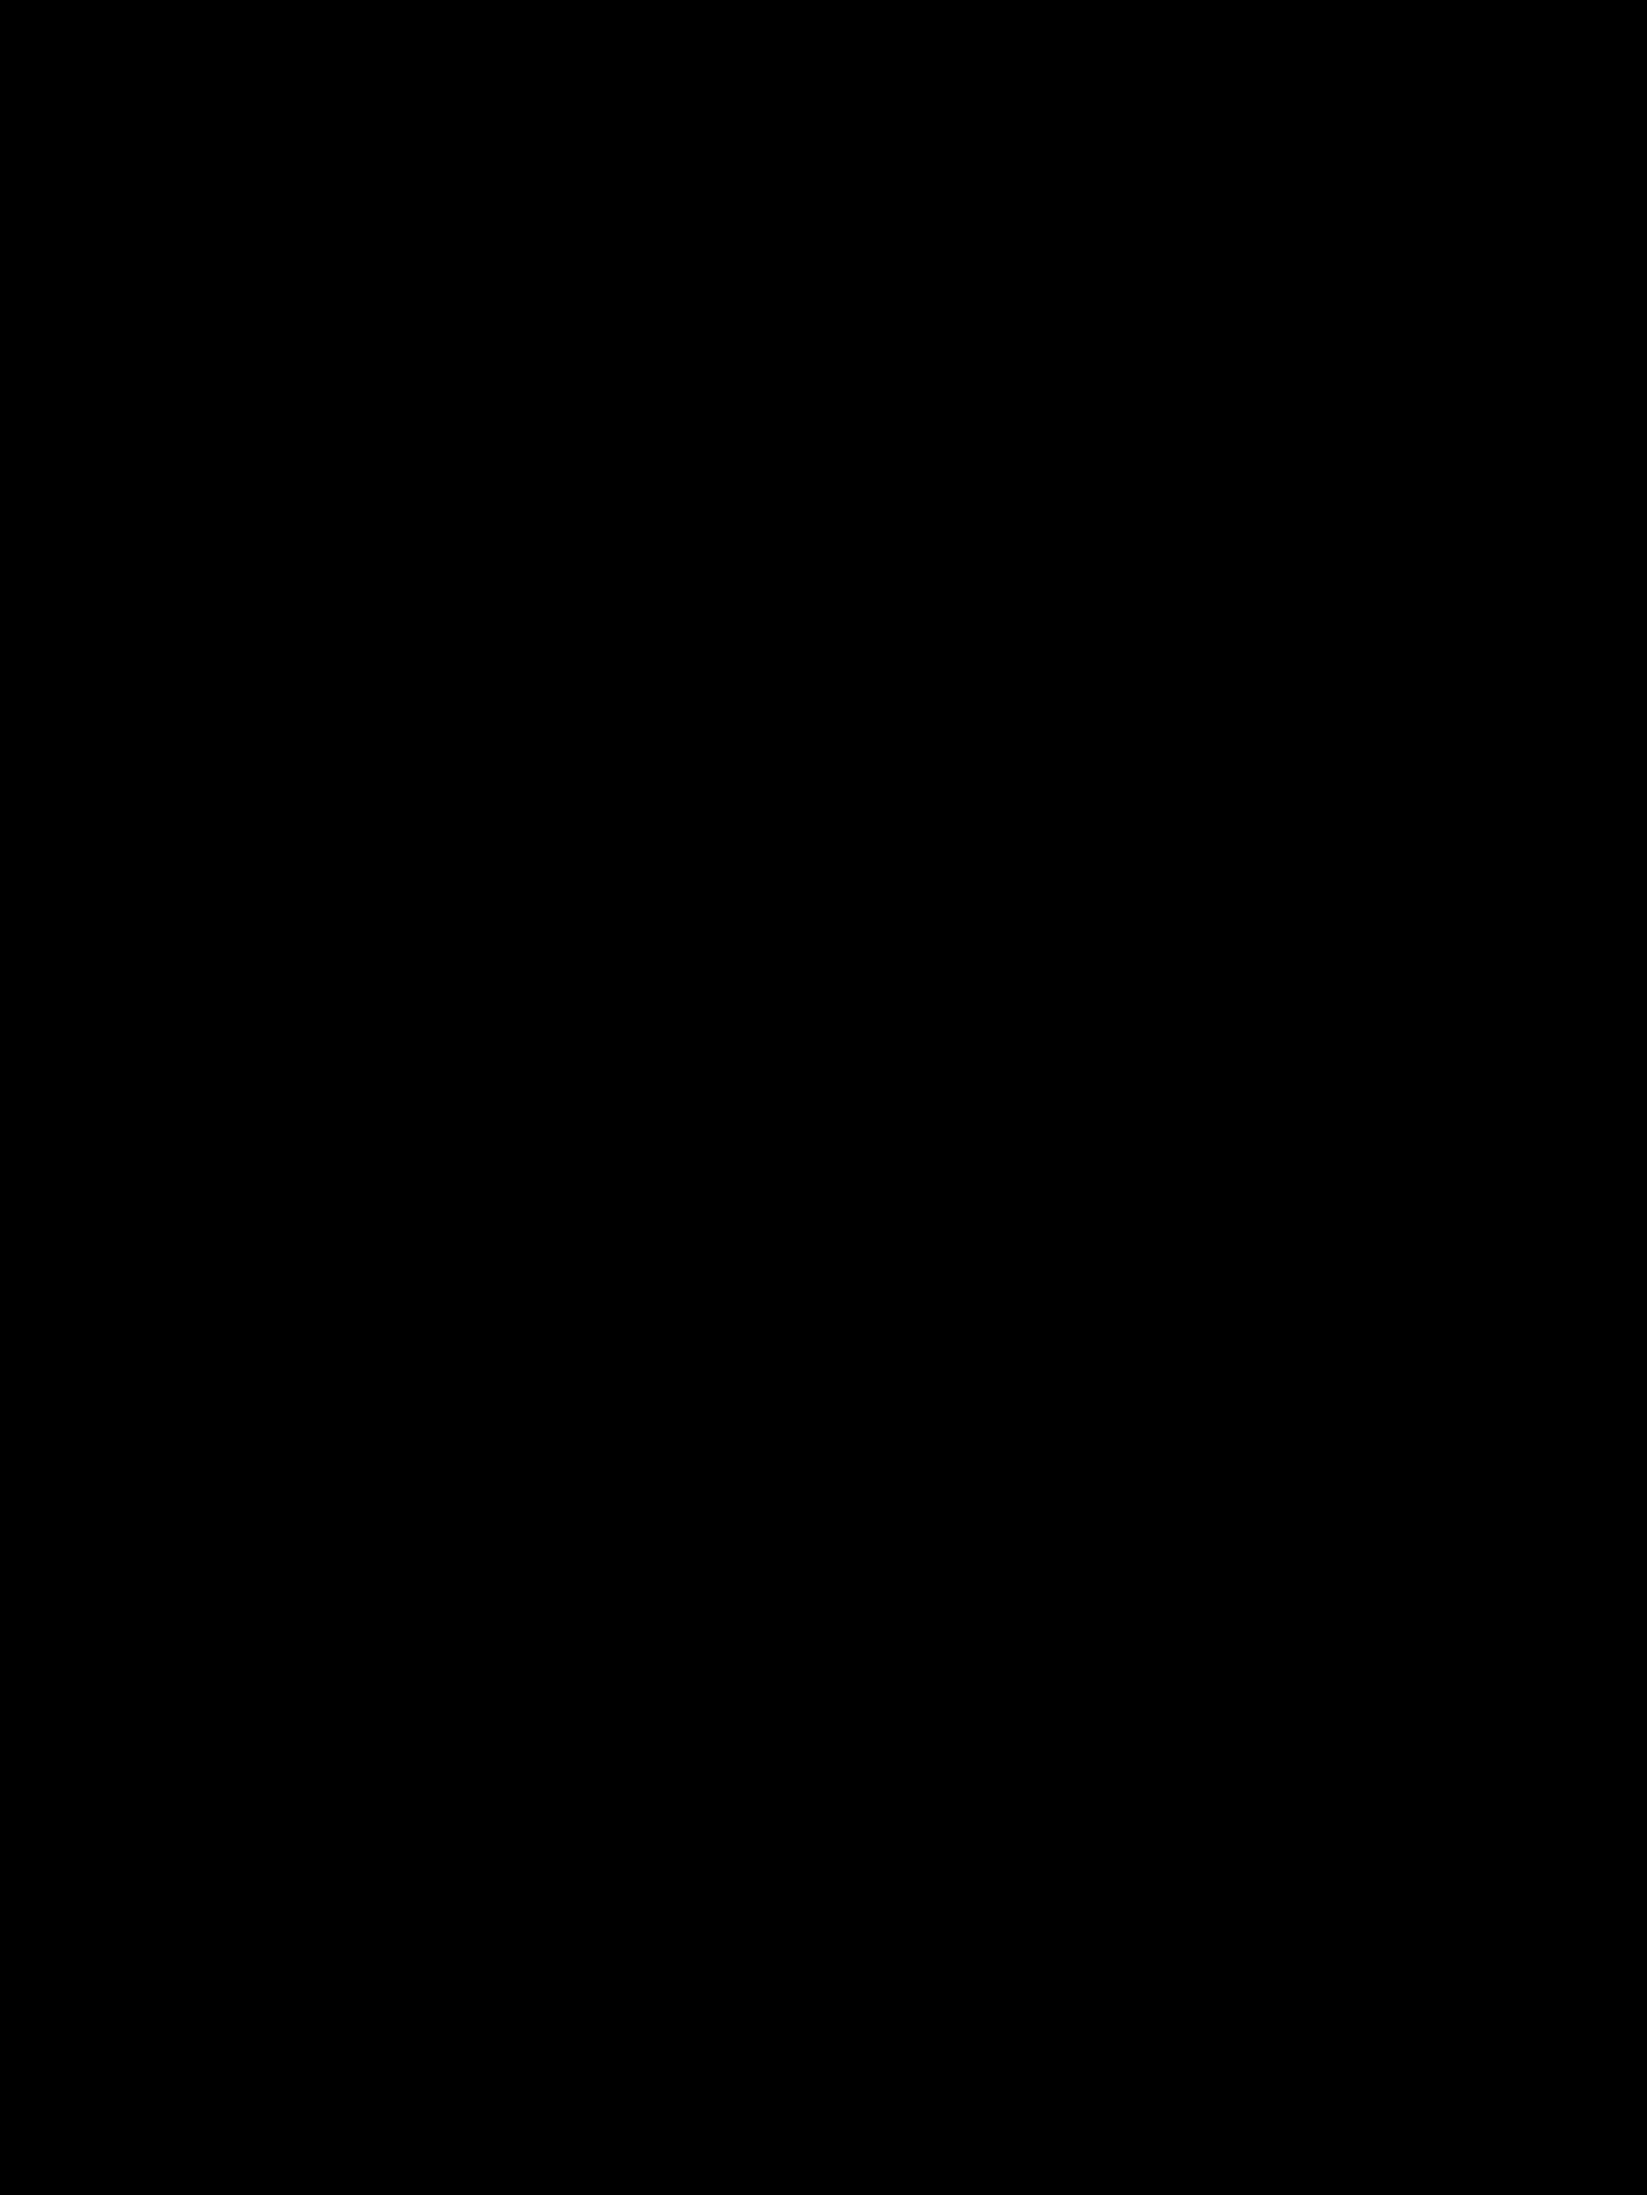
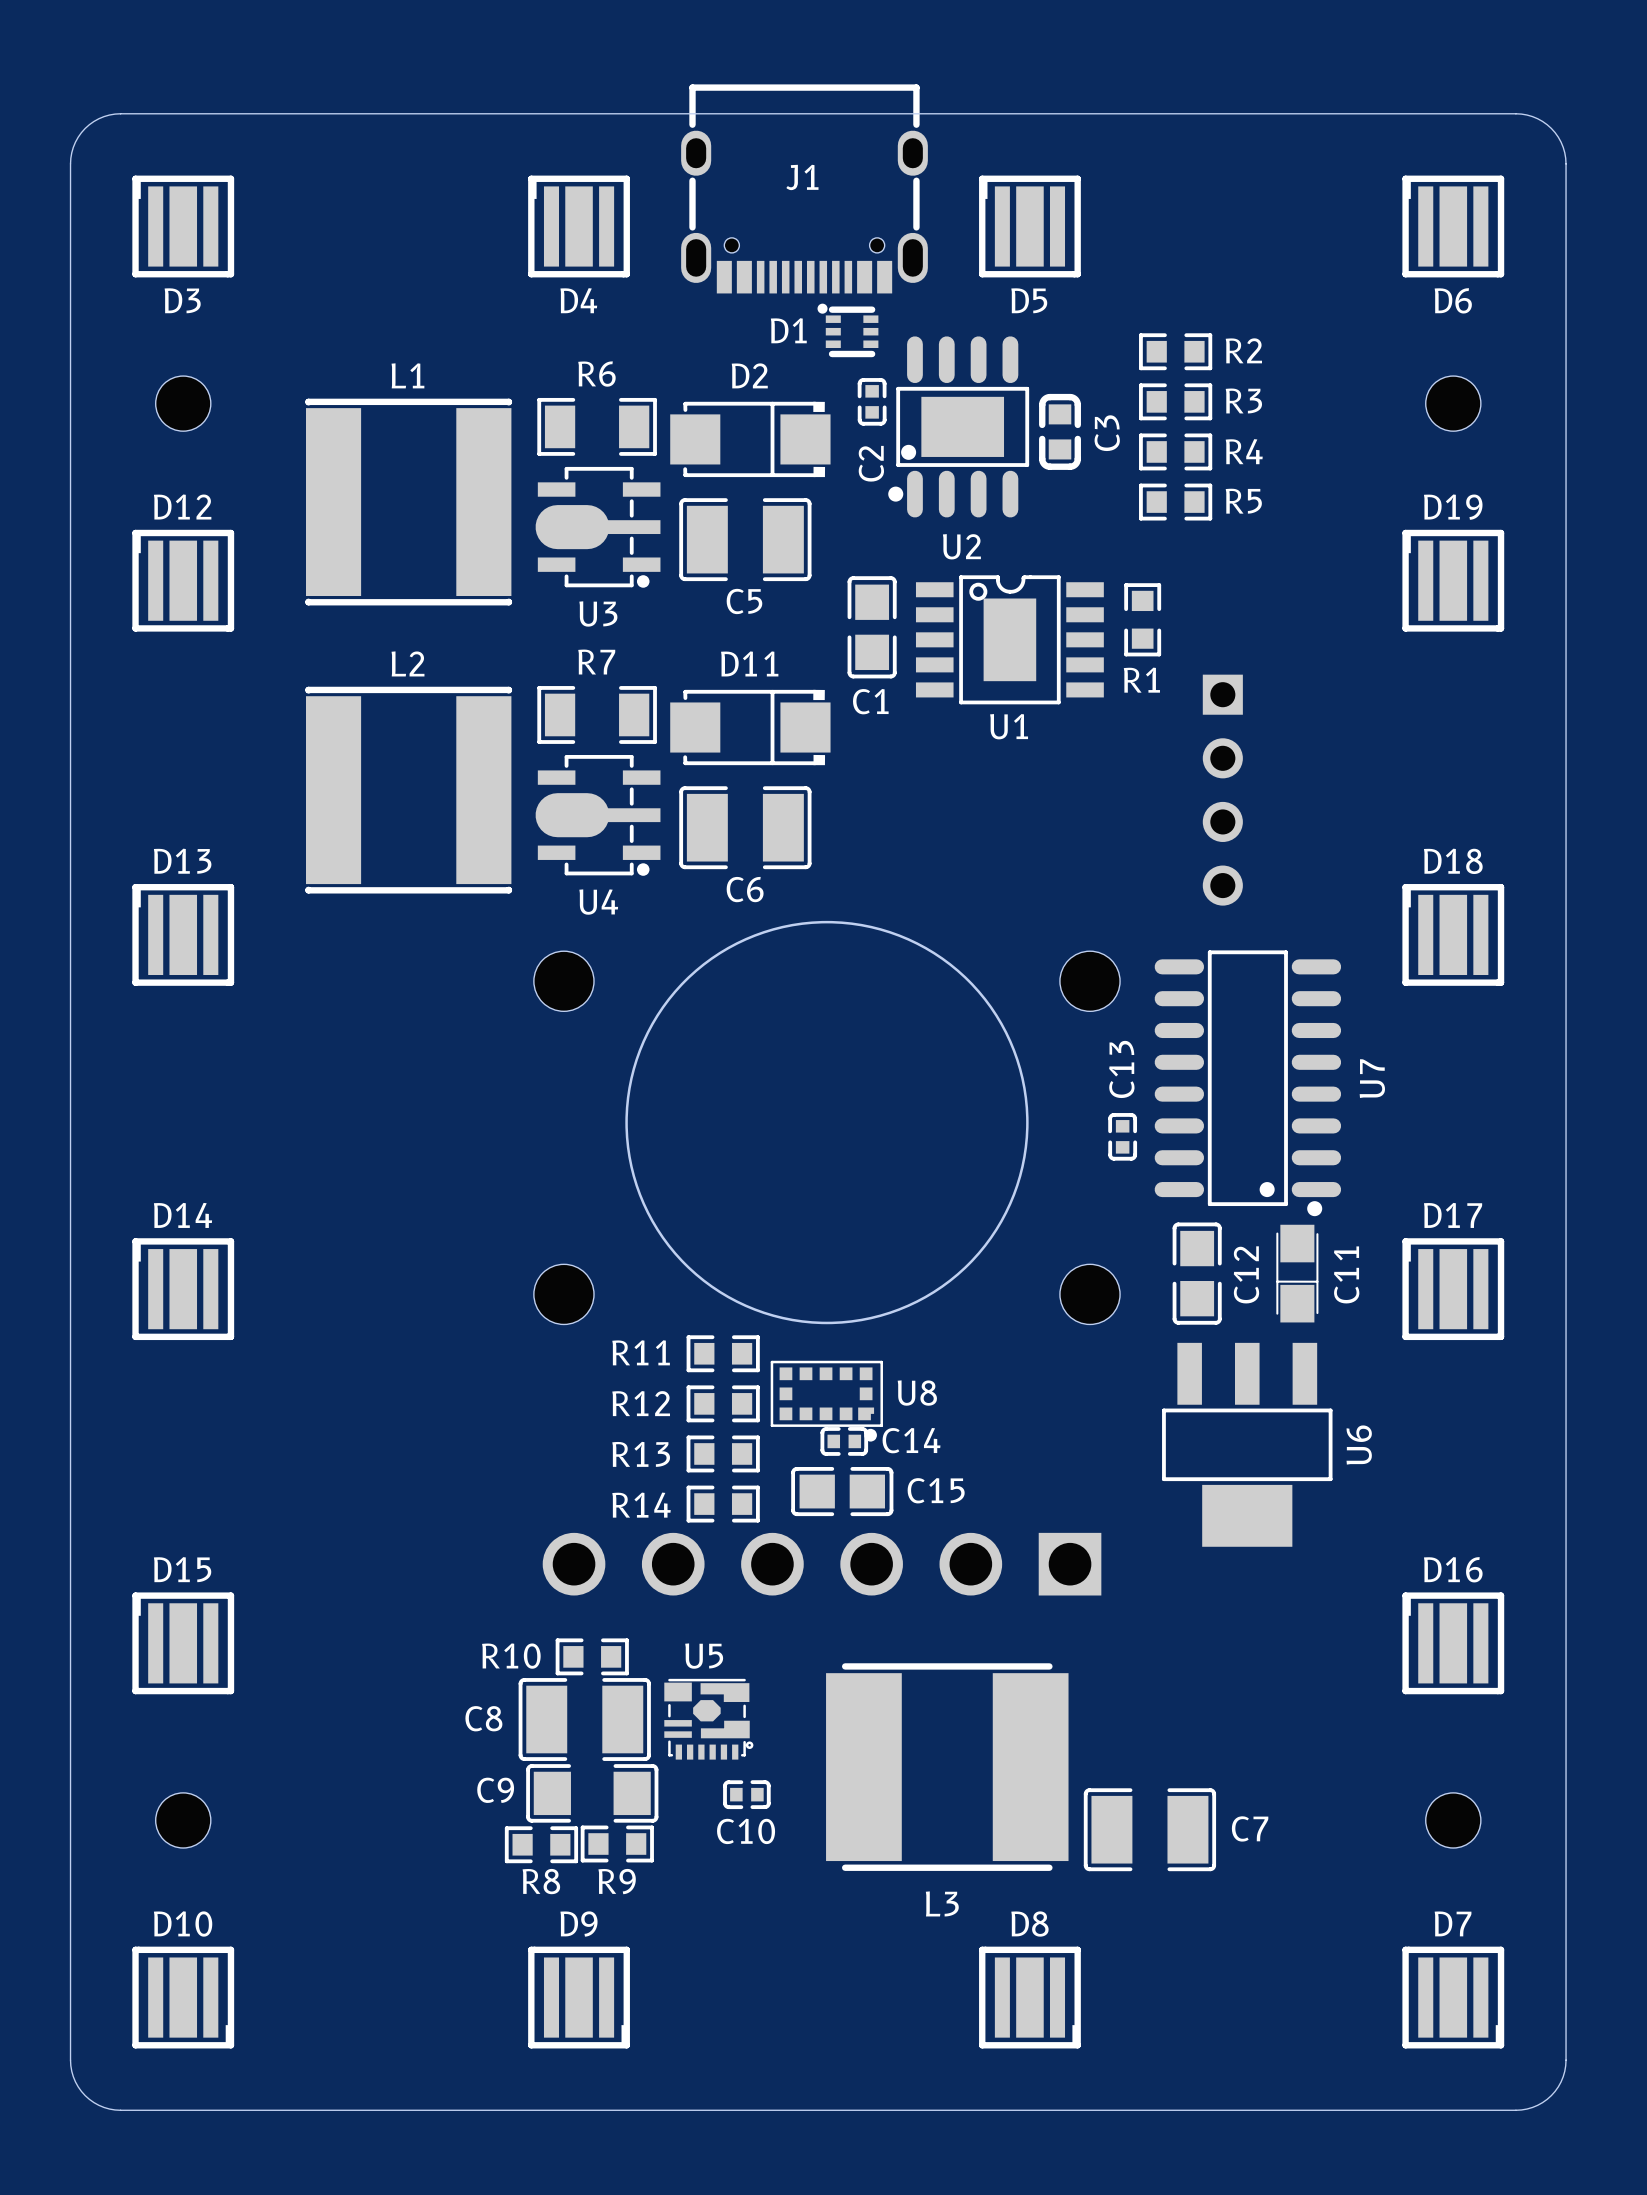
board edge: none -> (120, 113) (1515, 113) (1537, 118) (1555, 132) (1563, 147) (1566, 163) (1566, 2060) (1561, 2081) (1547, 2099) (1532, 2107) (1515, 2110) (120, 2110) (98, 2105) (81, 2091) (73, 2076) (70, 2060) (70, 163) (73, 147) (85, 128) (104, 116) (120, 113)
J1: none -> (804, 188)
D3: none -> (183, 226)
D4: none -> (579, 226)
D5: none -> (1029, 226)
D6: none -> (1453, 226)
D1: none -> (847, 330)
R2: none -> (1175, 351)
C2: none -> (872, 401)
R3: none -> (1175, 401)
part: none -> (183, 403)
part: none -> (1453, 403)
R6: none -> (597, 426)
U2: none -> (958, 426)
C3: none -> (1060, 431)
D2: none -> (750, 439)
R4: none -> (1175, 451)
L1: none -> (408, 502)
R5: none -> (1175, 502)
U3: none -> (598, 527)
C5: none -> (745, 539)
D12: none -> (183, 580)
D19: none -> (1453, 580)
R1: none -> (1142, 619)
C1: none -> (872, 627)
U1: none -> (1009, 639)
R7: none -> (597, 714)
D11: none -> (750, 727)
L2: none -> (408, 790)
part: none -> (1222, 790)
U4: none -> (598, 815)
C6: none -> (745, 827)
round board edge: none -> [625, 920, 1029, 1325]
D13: none -> (183, 934)
D18: none -> (1453, 934)
part: none -> (563, 981)
part: none -> (1090, 981)
U7: none -> (1247, 1083)
C13: none -> (1122, 1136)
C12: none -> (1197, 1273)
C11: none -> (1297, 1273)
D14: none -> (183, 1289)
D17: none -> (1453, 1289)
part: none -> (563, 1294)
part: none -> (1090, 1294)
R11: none -> (723, 1353)
U8: none -> (826, 1401)
R12: none -> (723, 1403)
C14: none -> (844, 1441)
U6: none -> (1247, 1444)
R13: none -> (723, 1453)
C15: none -> (842, 1491)
R14: none -> (723, 1504)
part: none -> (822, 1564)
D15: none -> (183, 1643)
D16: none -> (1453, 1643)
R10: none -> (592, 1656)
C8: none -> (584, 1719)
U5: none -> (708, 1719)
L3: none -> (947, 1767)
C9: none -> (592, 1793)
C10: none -> (746, 1794)
part: none -> (183, 1820)
part: none -> (1453, 1820)
C7: none -> (1149, 1829)
R8: none -> (541, 1844)
R9: none -> (617, 1844)
D10: none -> (183, 1997)
D9: none -> (579, 1997)
D8: none -> (1029, 1997)
D7: none -> (1453, 1997)

